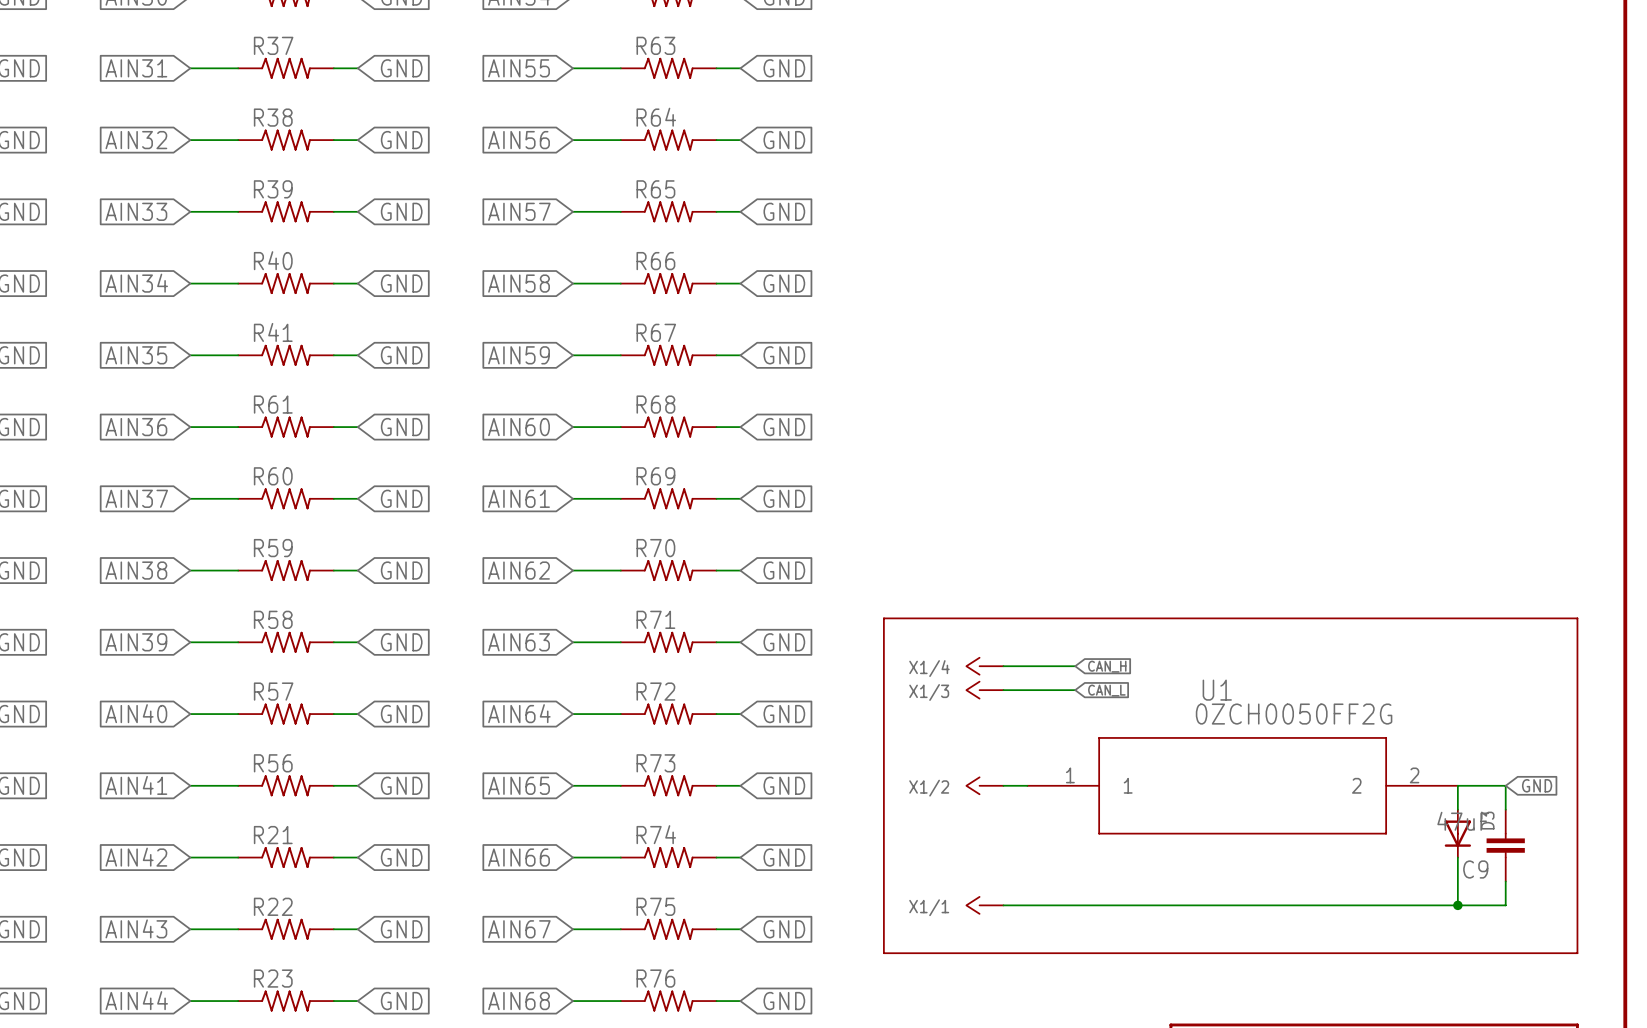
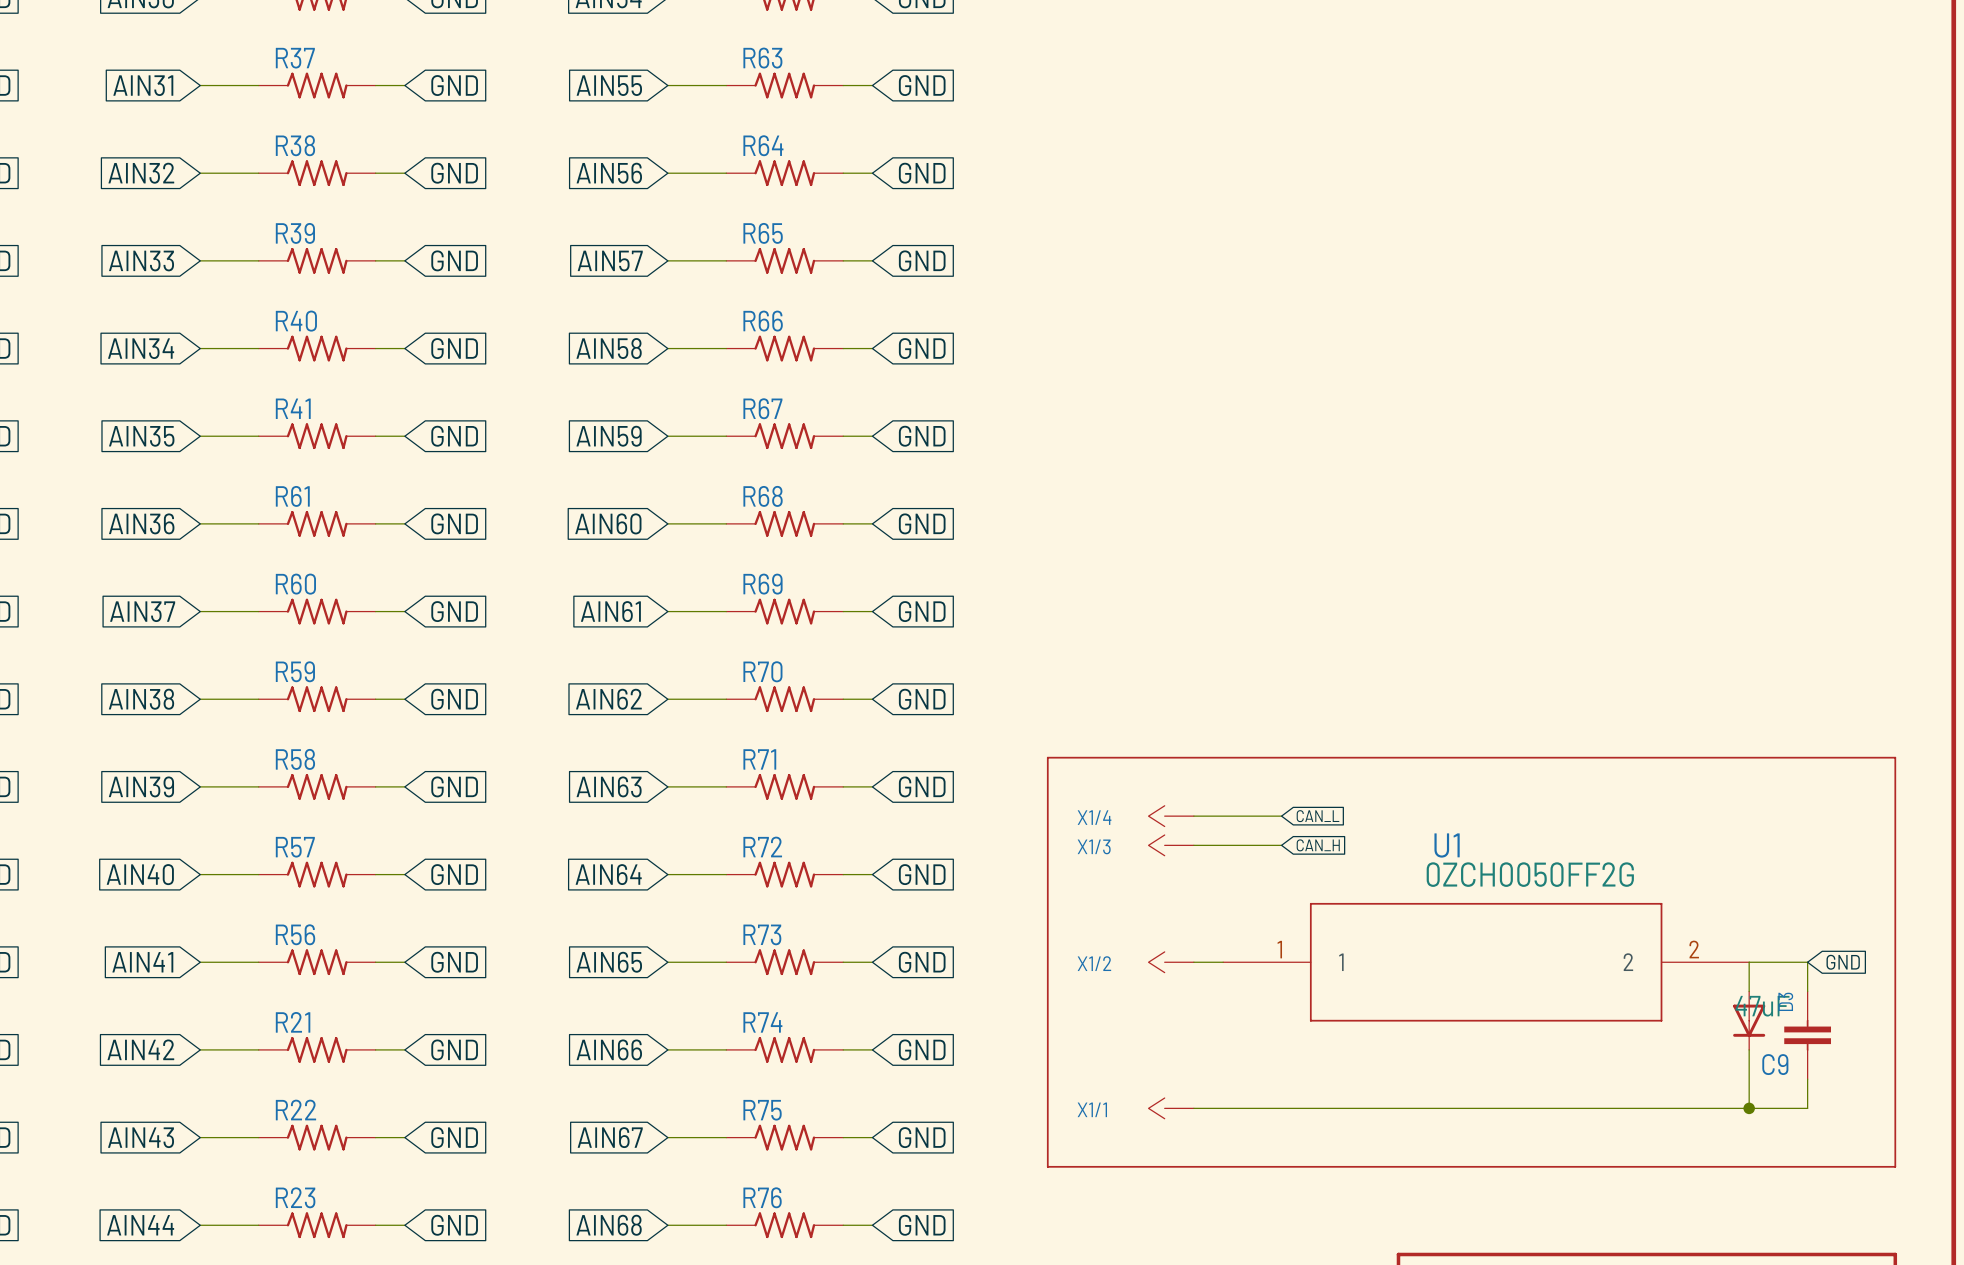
global label: CAN_H (1107, 666) -> CAN_L (1317, 816)
global label: CAN_L (1106, 690) -> CAN_H (1318, 845)

